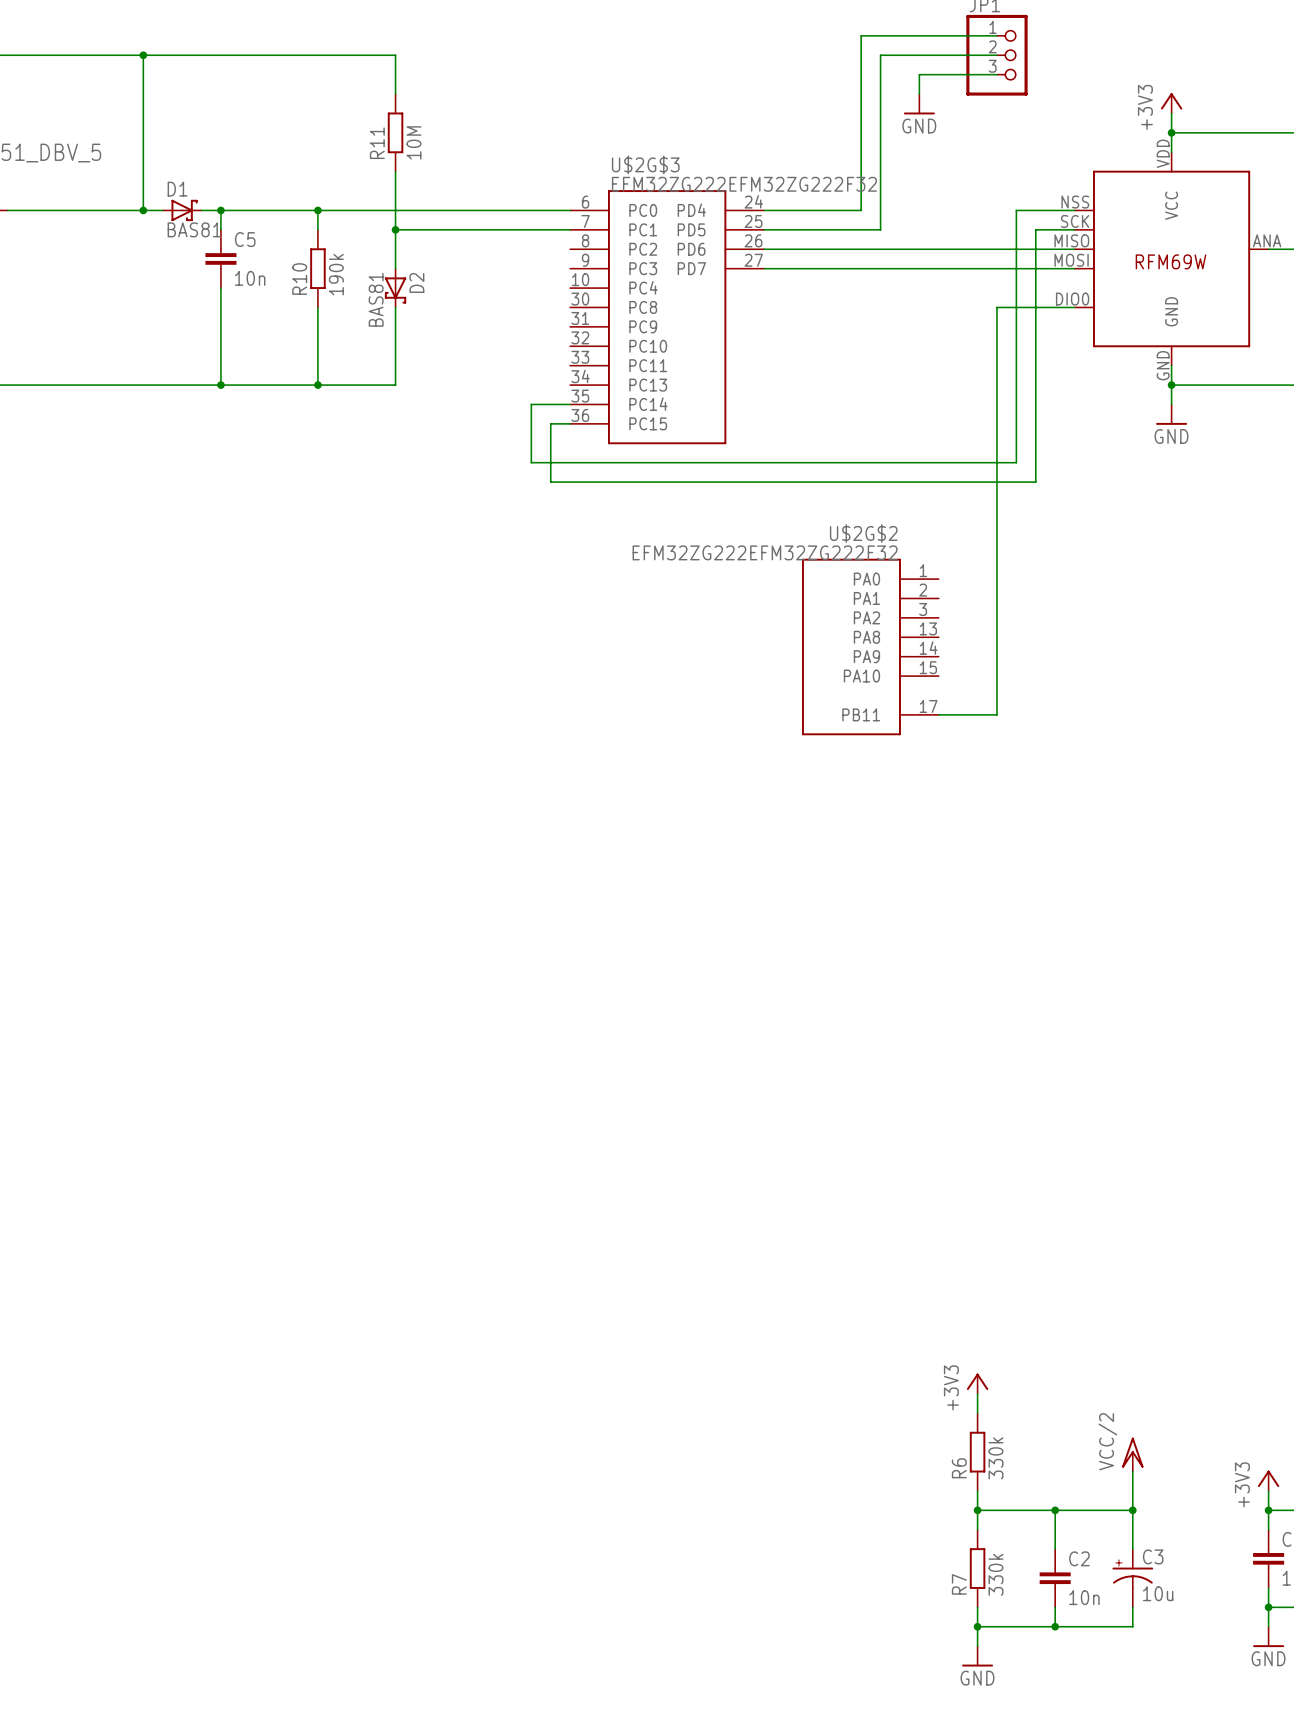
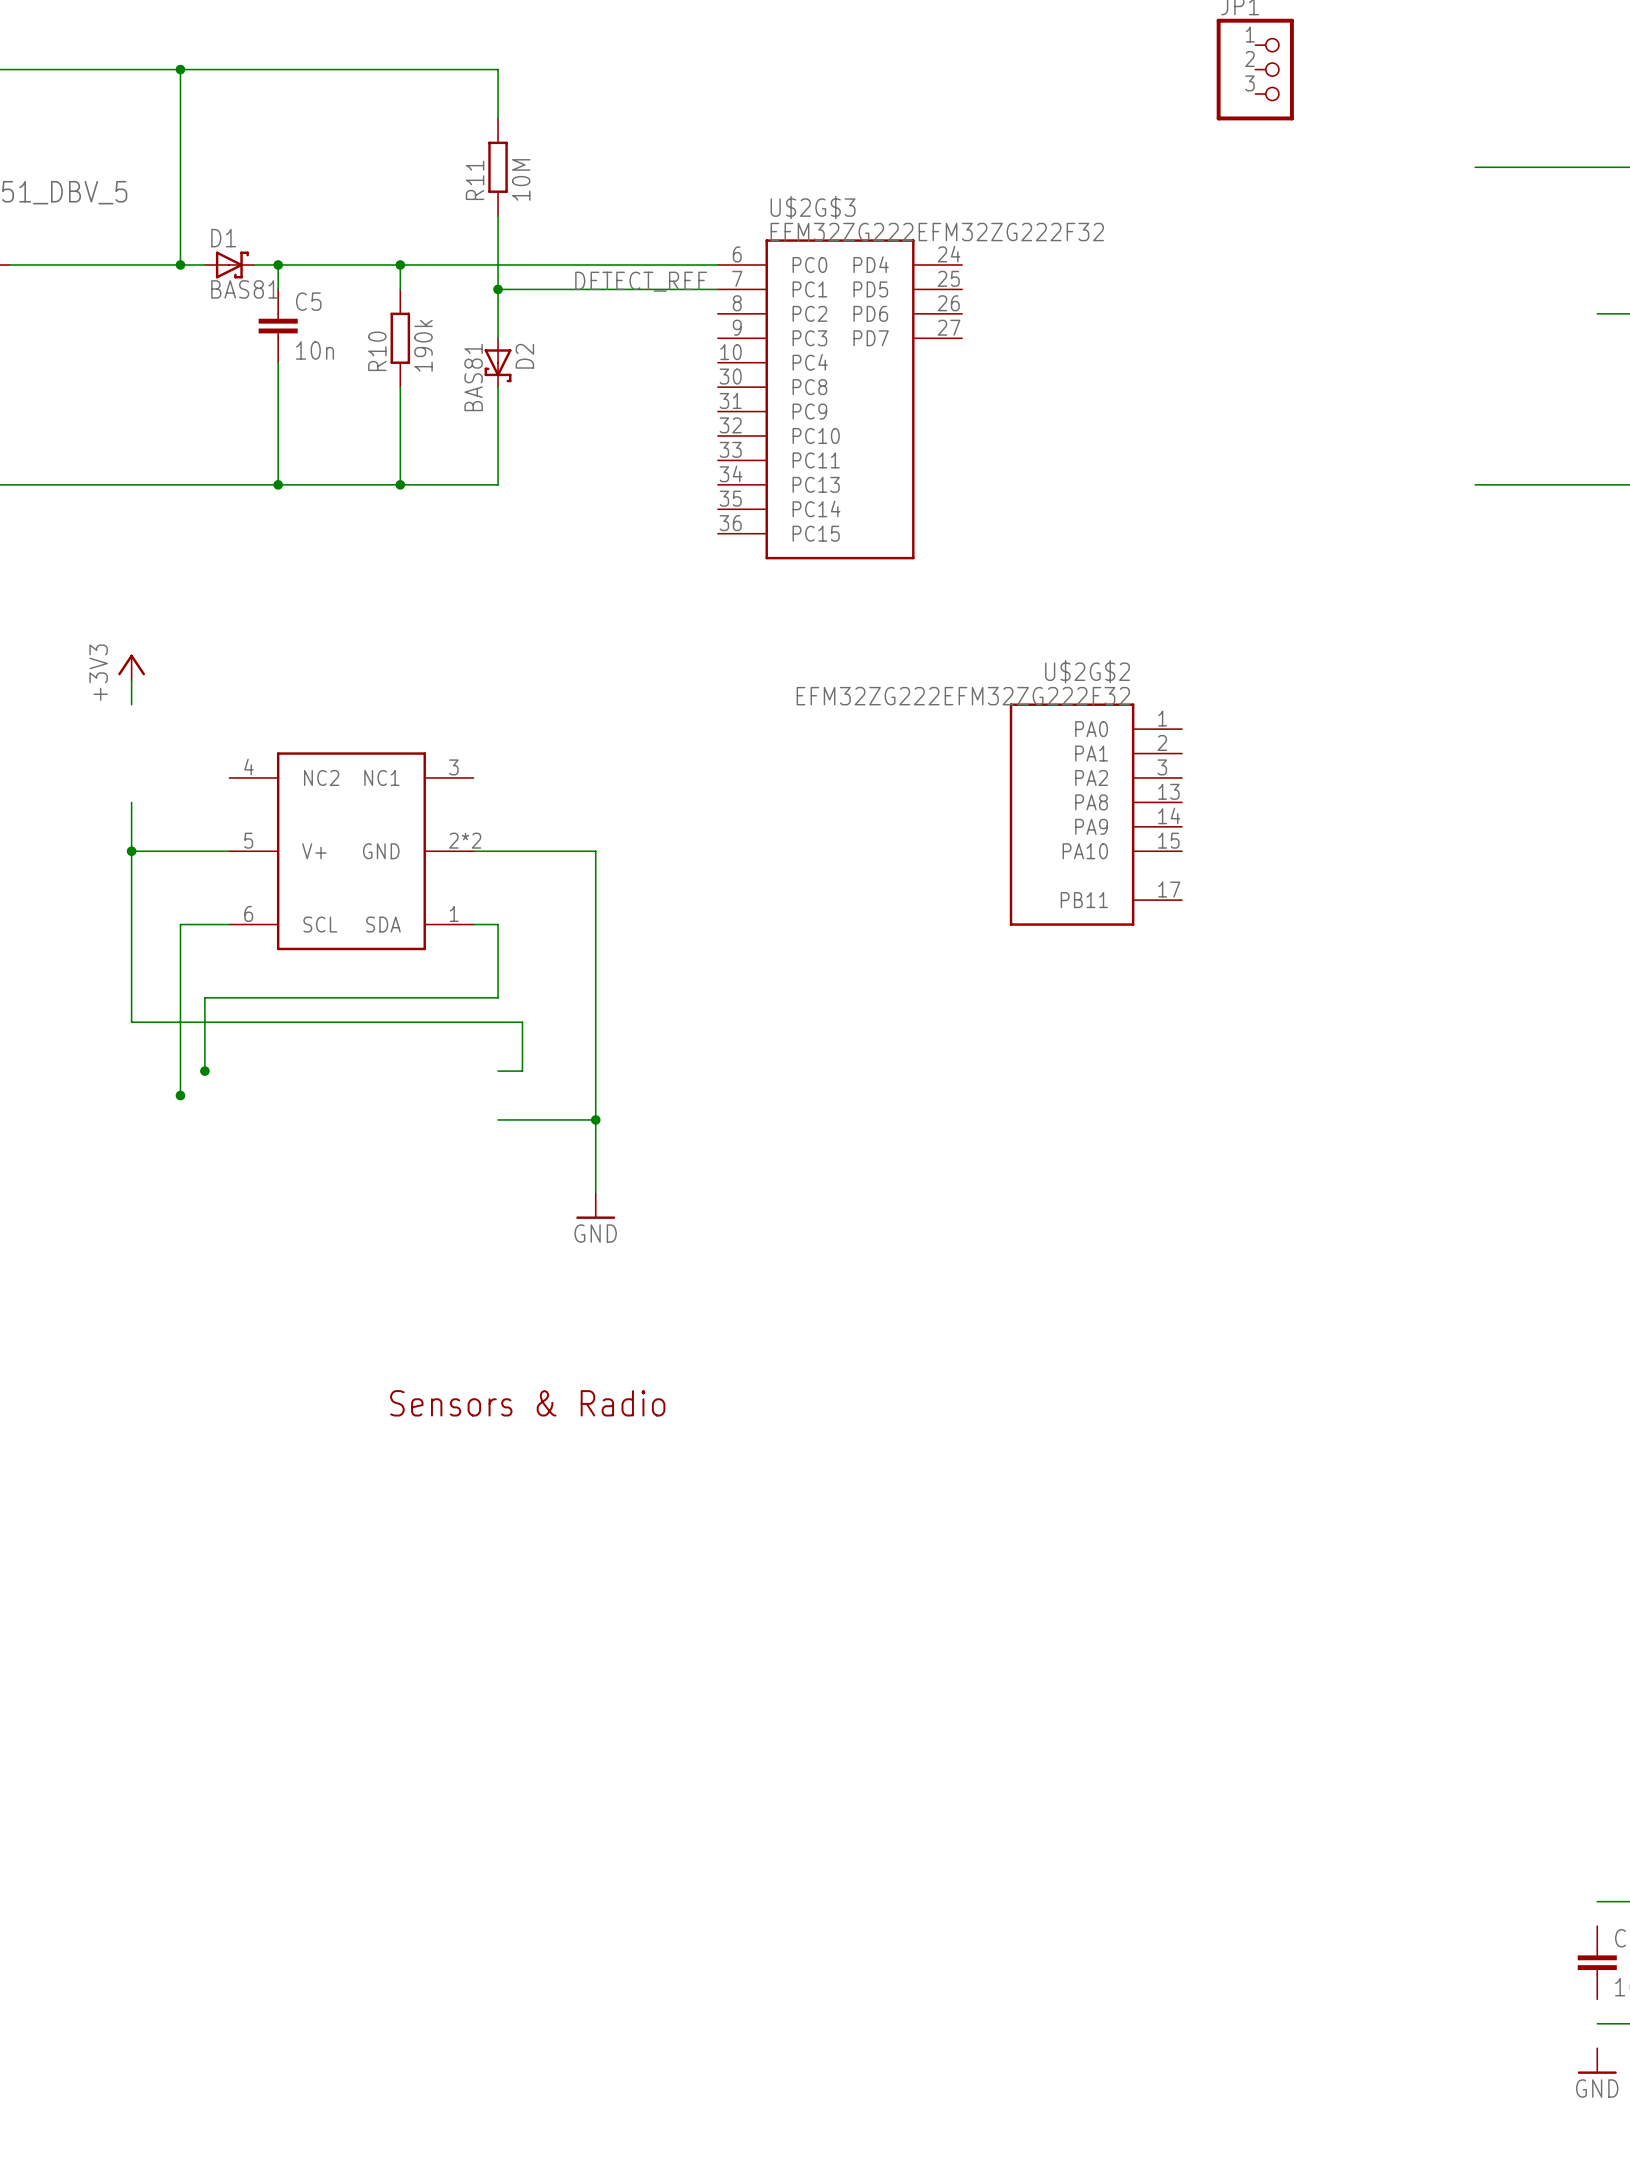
wire: (996, 35) (861, 35) (861, 210) (764, 210) -> none
wire: (996, 55) (880, 55) (880, 229) (764, 229) -> none
wire: (996, 74) (919, 74) (919, 94) -> none
power symbol: +3V3 (1171, 103) -> none
power symbol: GND (919, 104) -> none
wire: (1171, 113) (1171, 152) -> none
junction: (1171, 132) -> none
wire: (1074, 210) (1016, 210) (1016, 462) (531, 462) (531, 404) (570, 404) -> none
label: none -> DETECT_REF (641, 281)
wire: (1074, 229) (1035, 229) (1035, 482) (550, 482) (550, 423) (570, 423) -> none
wire: (764, 249) (1074, 249) -> none
part: (1171, 258) -> none
wire: (764, 268) (1074, 268) -> none
wire: (1074, 307) (996, 307) (996, 714) (938, 714) -> none
wire: (1171, 365) (1171, 404) -> none
junction: (1171, 385) -> none
power symbol: GND (1171, 414) -> none
power symbol: none -> +3V3 (131, 667)
wire: none -> (131, 680) (131, 704)
wire: none -> (131, 802) (131, 1022) (522, 1022) (522, 1071) (498, 1071)
wire: none -> (131, 851) (229, 851)
junction: none -> (131, 851)
part: none -> (351, 851)
wire: none -> (473, 851) (595, 851) (595, 1193)
wire: none -> (229, 924) (180, 924) (180, 1095)
wire: none -> (473, 924) (498, 924) (498, 997) (204, 997) (204, 1071)
junction: none -> (204, 1071)
junction: none -> (180, 1095)
wire: none -> (498, 1119) (595, 1119)
junction: none -> (595, 1119)
power symbol: none -> GND (595, 1206)
text: none -> Sensors & Radio (527, 1403)
power symbol: +3V3 (977, 1383) -> none
wire: (977, 1393) (977, 1413) -> none
R6: 330k (977, 1452) -> none
power symbol: VCC/2 (1132, 1454) -> none
wire: (1132, 1471) (1132, 1549) -> none
power symbol: +3V3 (1268, 1480) -> none
wire: (977, 1490) (977, 1529) -> none
wire: (1268, 1490) (1268, 1529) -> none
wire: (977, 1510) (1132, 1510) -> none
junction: (977, 1510) -> none
wire: (1055, 1510) (1055, 1549) -> none
junction: (1055, 1510) -> none
junction: (1132, 1510) -> none
junction: (1268, 1510) -> none
R7: 330k (977, 1568) -> none
C2: 10n (1055, 1578) -> none
C3: 10u (1132, 1578) -> none
wire: (1268, 1587) (1268, 1626) -> none
wire: (977, 1607) (977, 1646) -> none
wire: (1055, 1607) (1055, 1626) -> none
wire: (1132, 1607) (1132, 1626) (977, 1626) -> none
junction: (1268, 1607) -> none
junction: (977, 1626) -> none
junction: (1055, 1626) -> none
power symbol: GND (977, 1656) -> none

